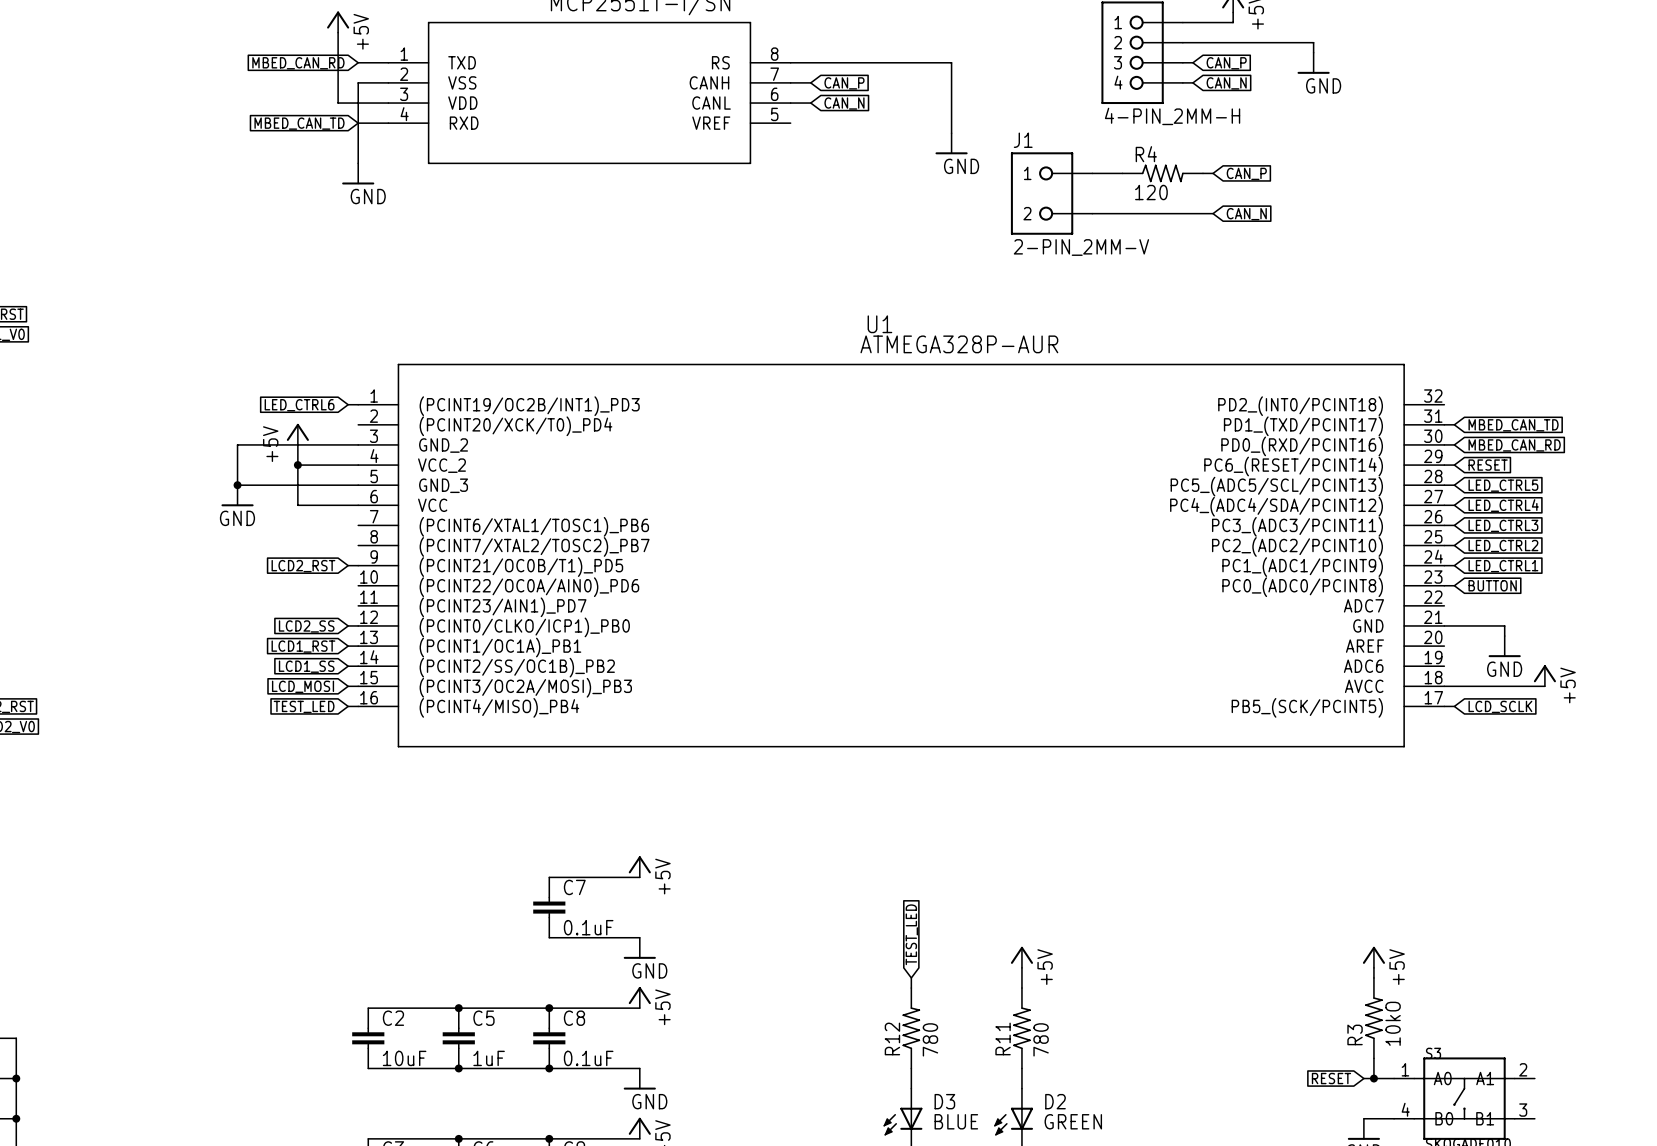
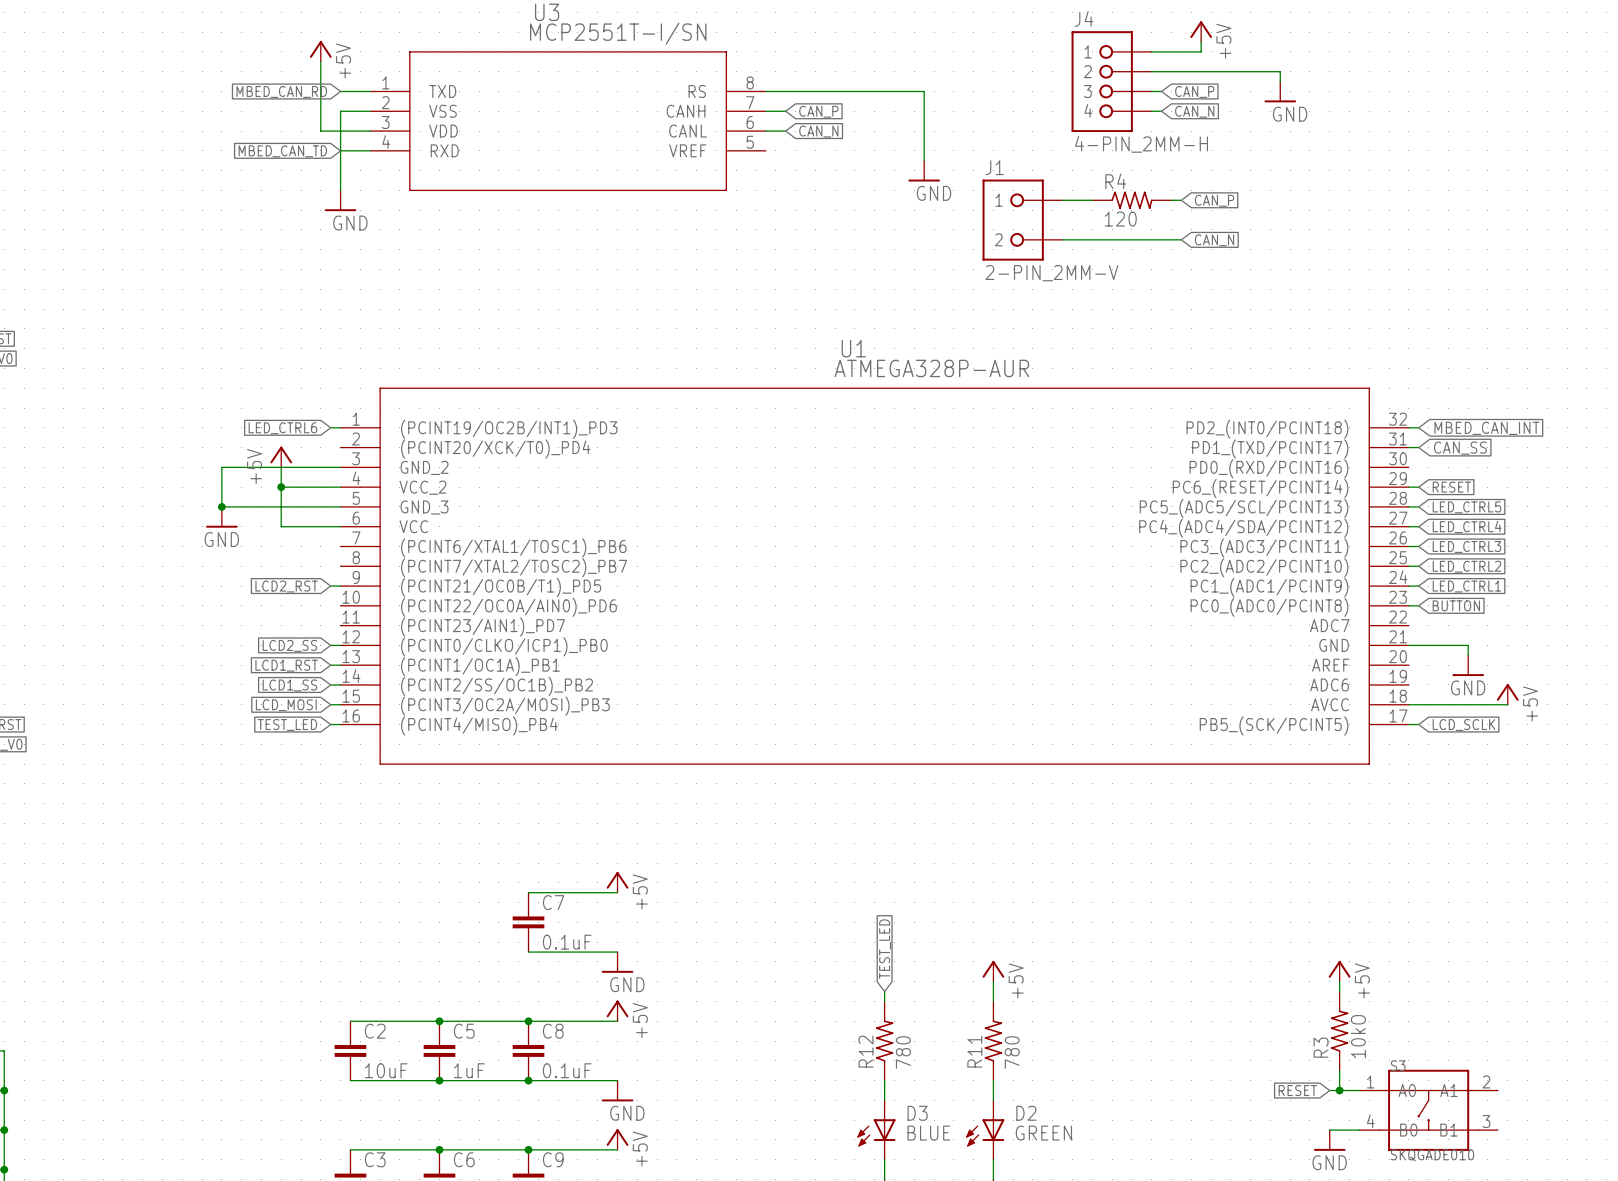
global label: none -> MBED_CAN_INT (1486, 428)
global label: MBED_CAN_TD (1513, 425) -> CAN_SS (1460, 448)
wire: (1444, 444) (1454, 444) -> (1408, 427) (1418, 427)
global label: MBED_CAN_RD (1514, 445) -> none

